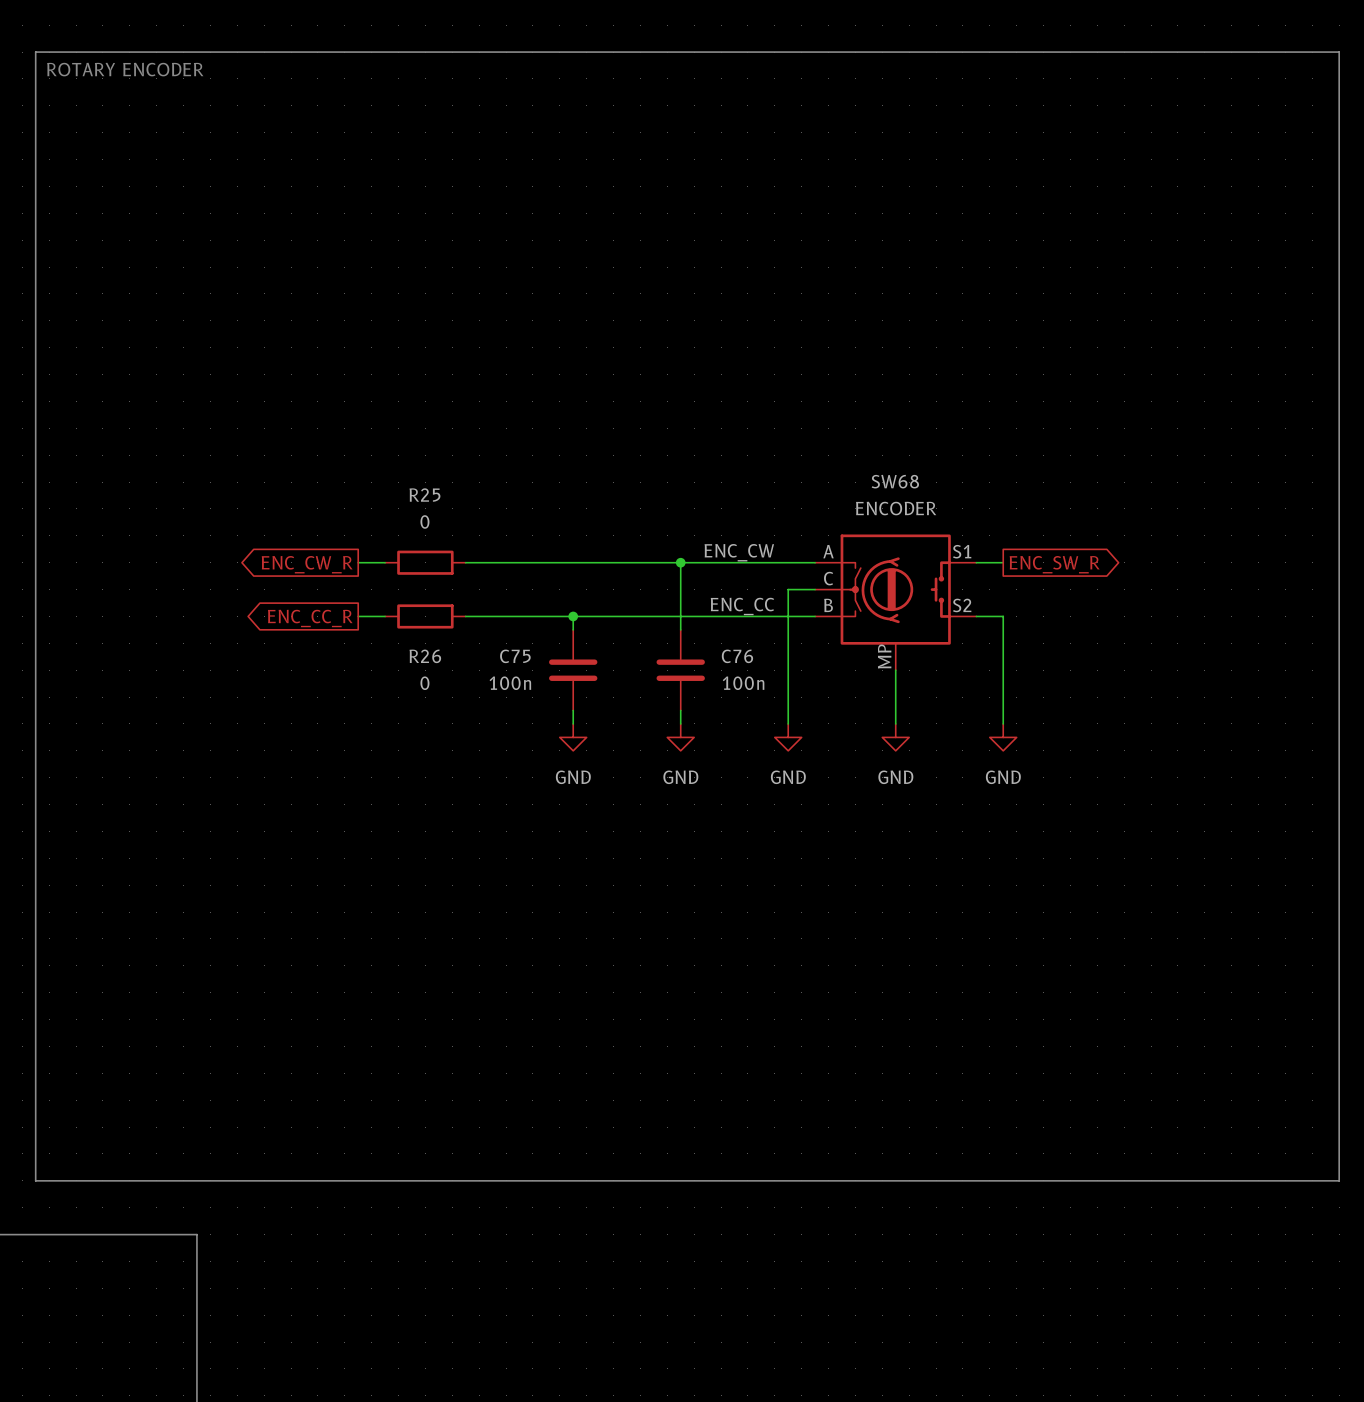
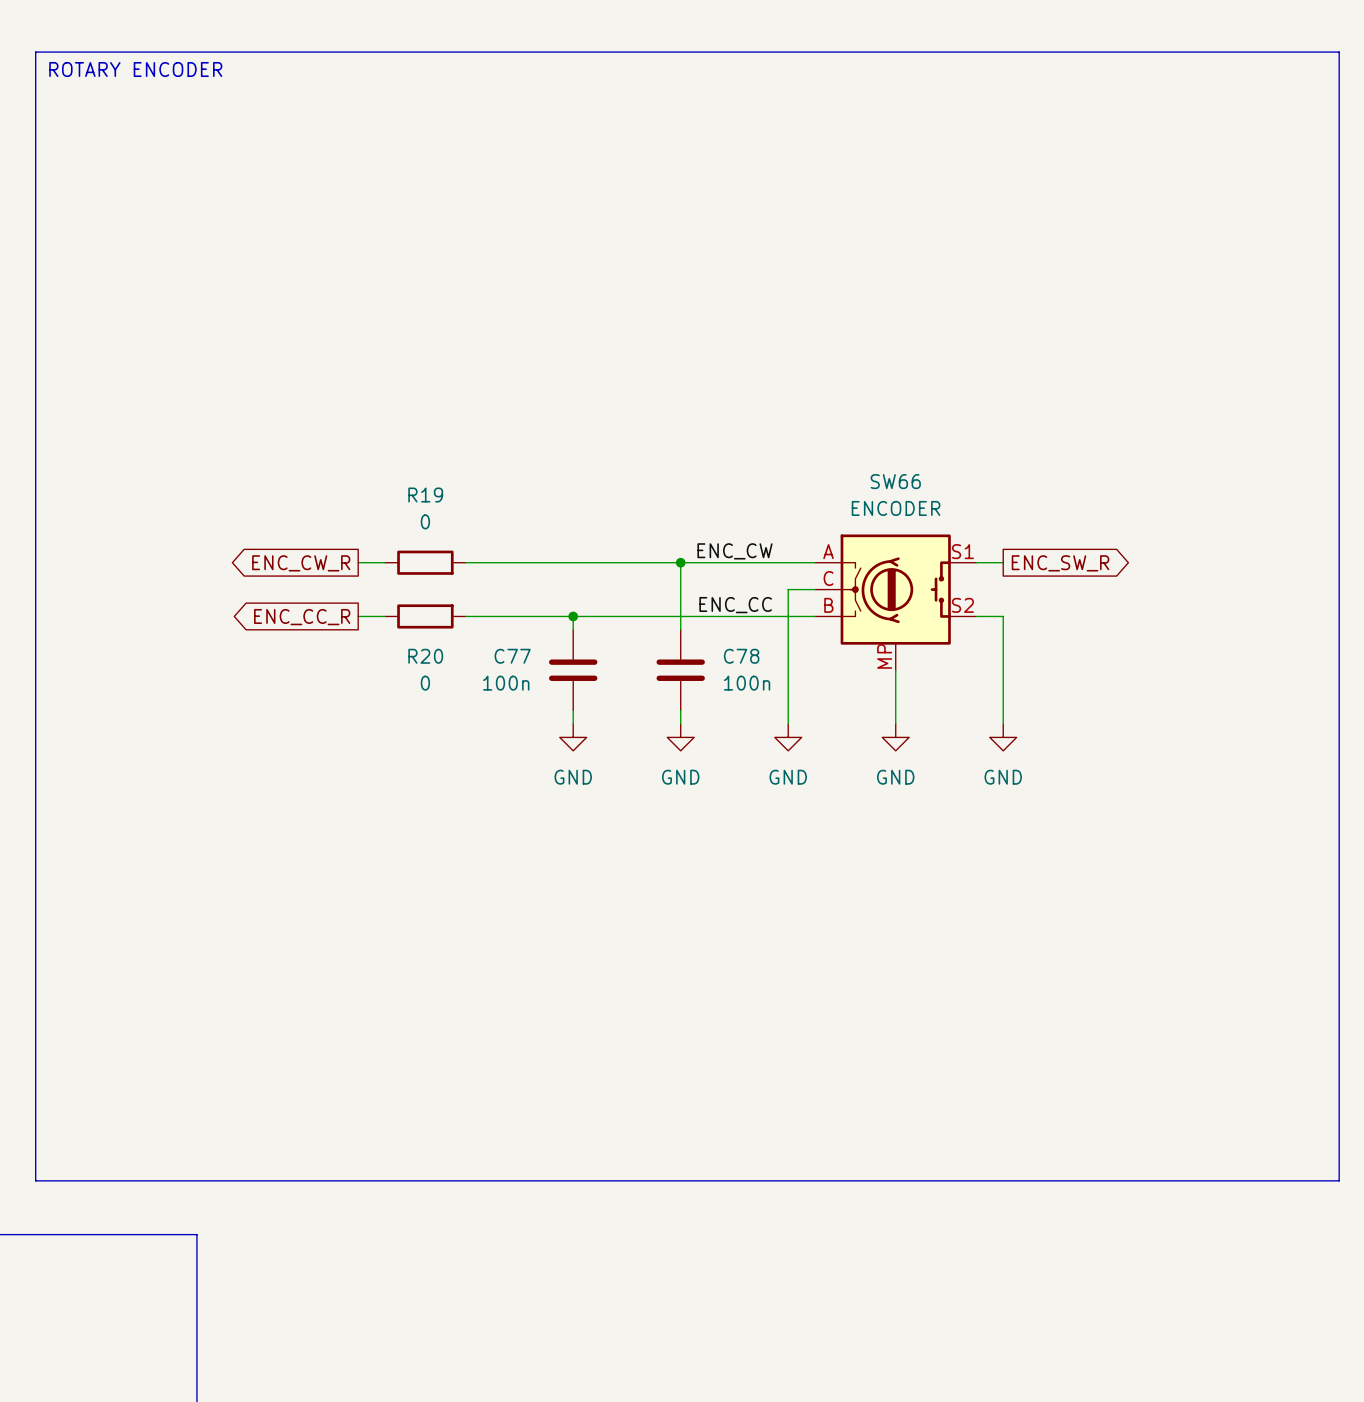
SW68 name: SW68 (895, 481) -> SW66 (895, 481)
R25 name: R25 (424, 495) -> R19 (425, 495)
R26 name: R26 (425, 656) -> R20 (425, 656)
C75 name: C75 (515, 656) -> C77 (512, 656)
C76 name: C76 (737, 656) -> C78 (741, 656)

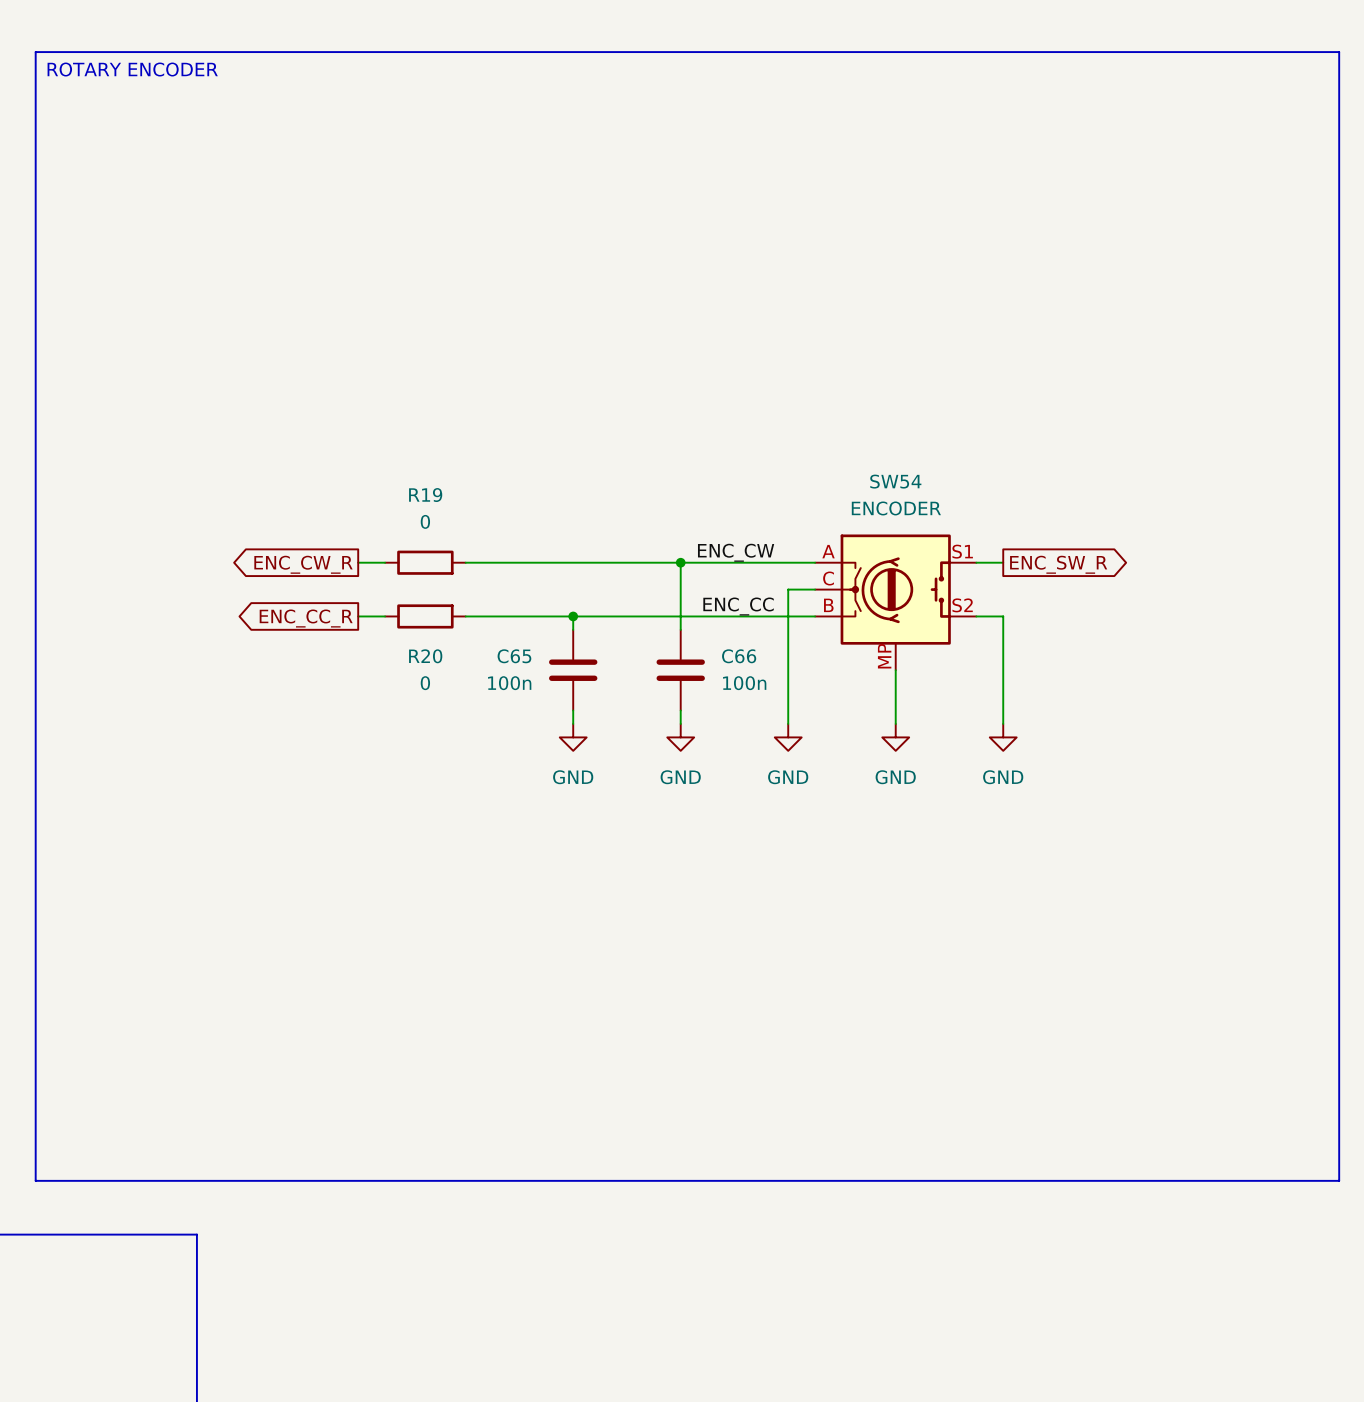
SW66 name: SW66 (895, 481) -> SW54 (895, 481)
C77 name: C77 (512, 656) -> C65 (514, 656)
C78 name: C78 (741, 656) -> C66 (739, 656)

